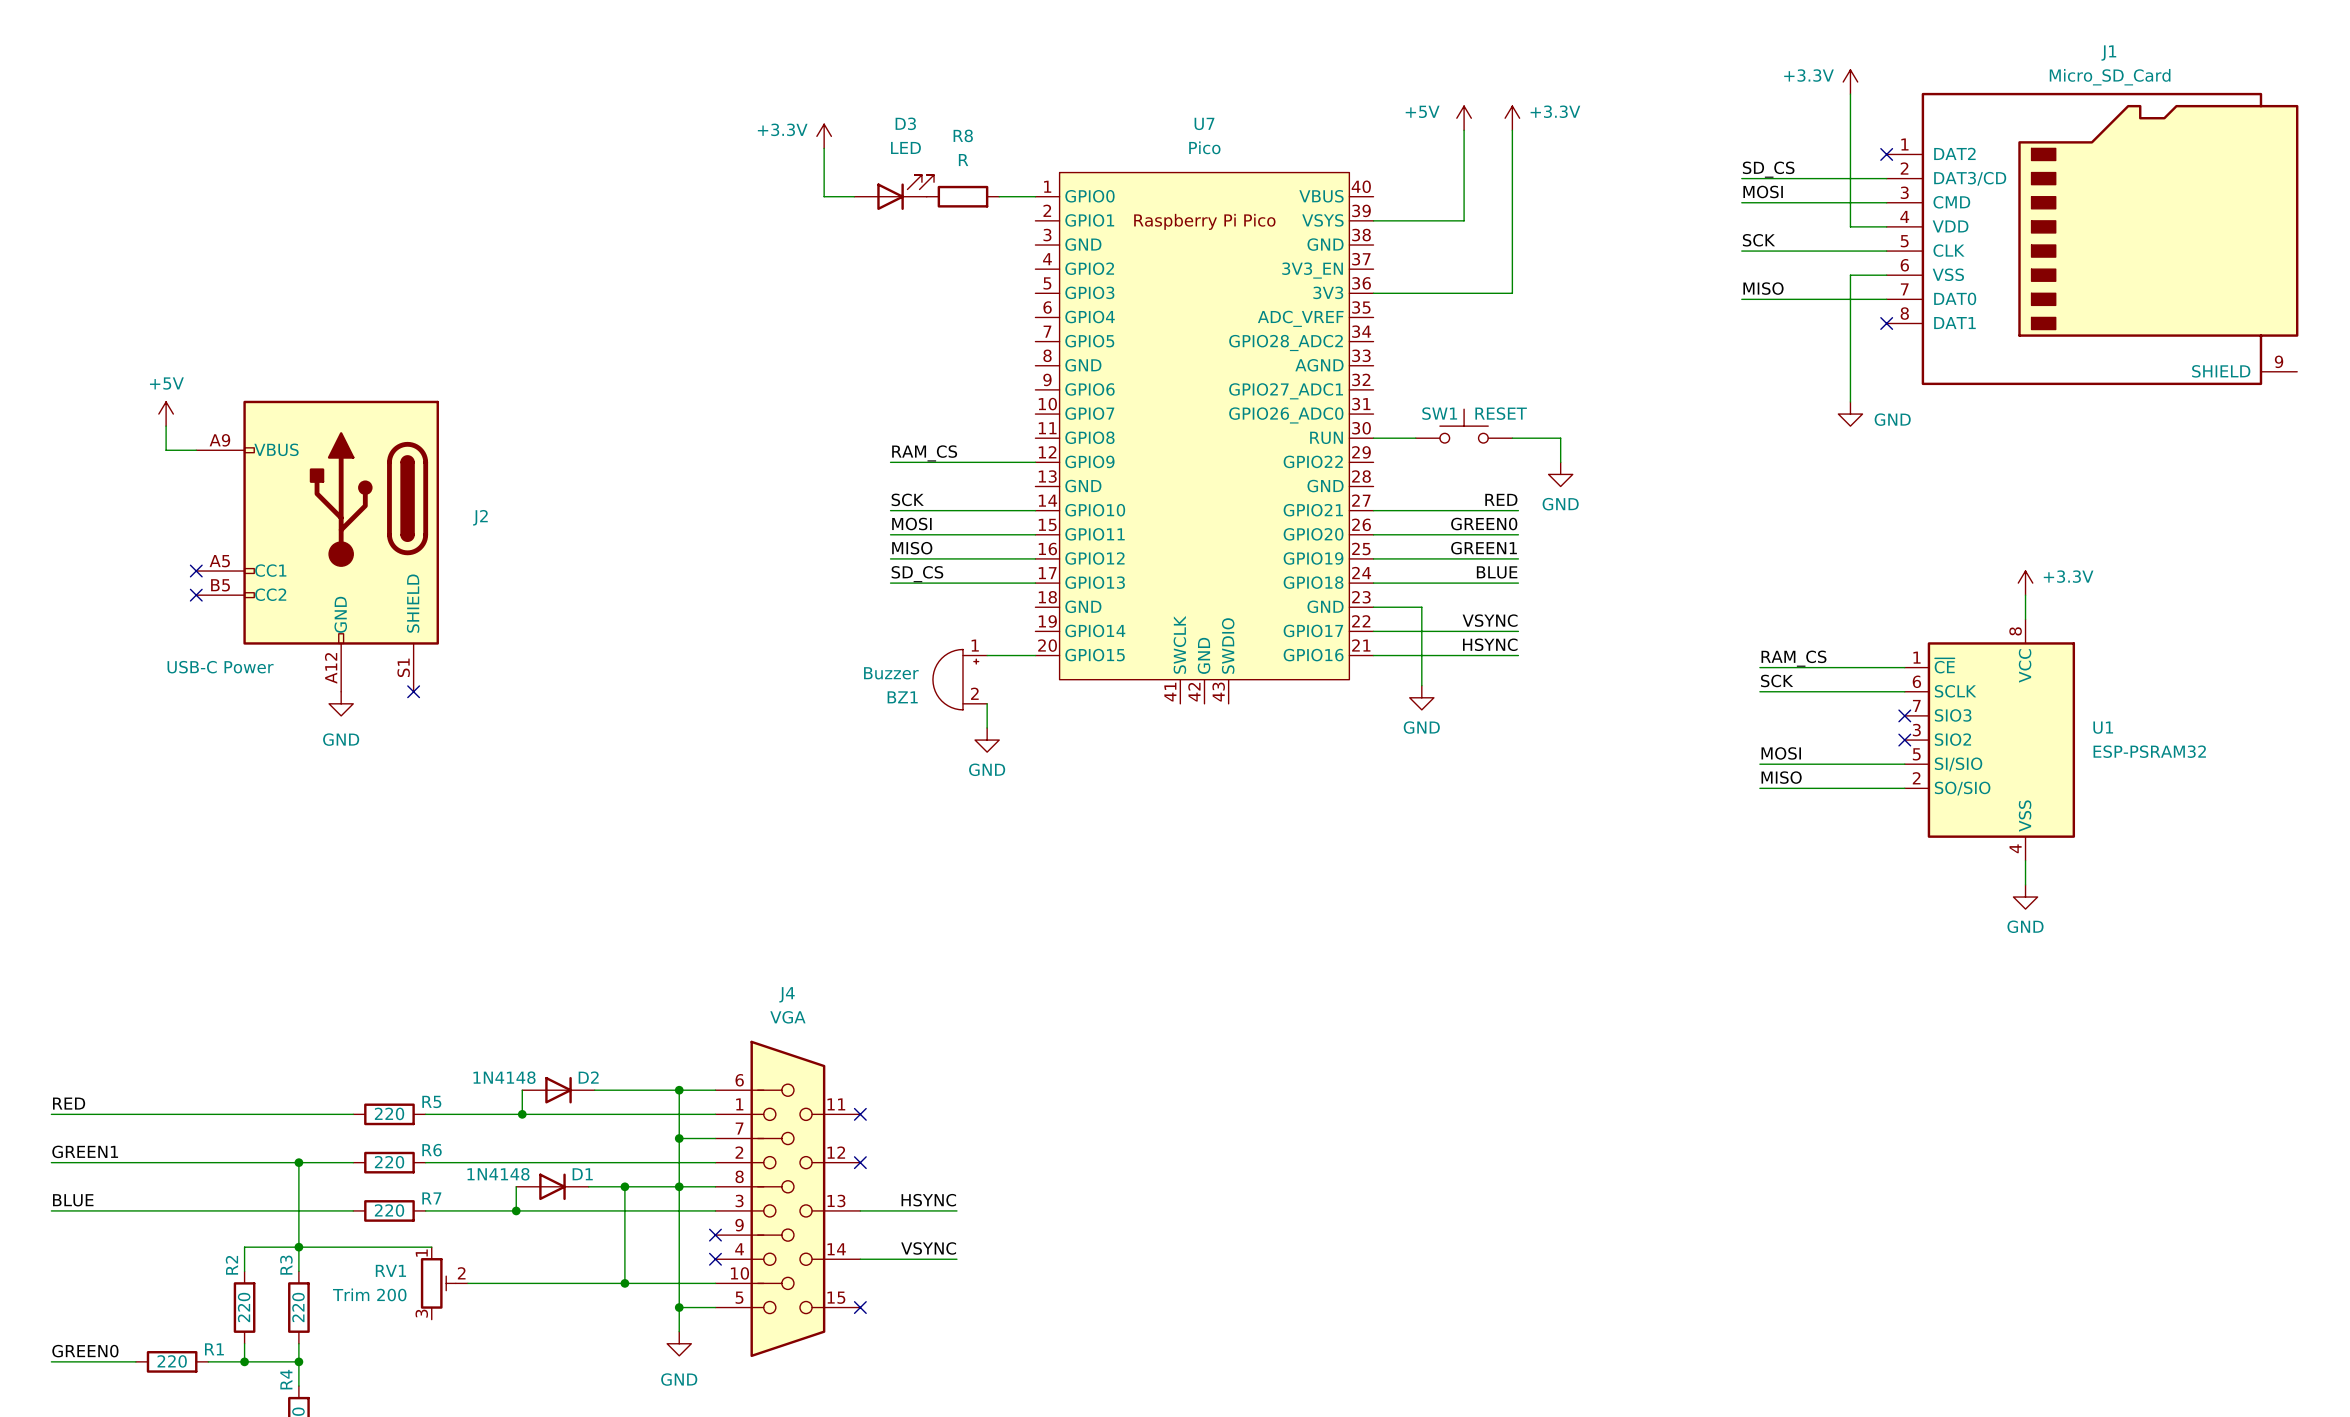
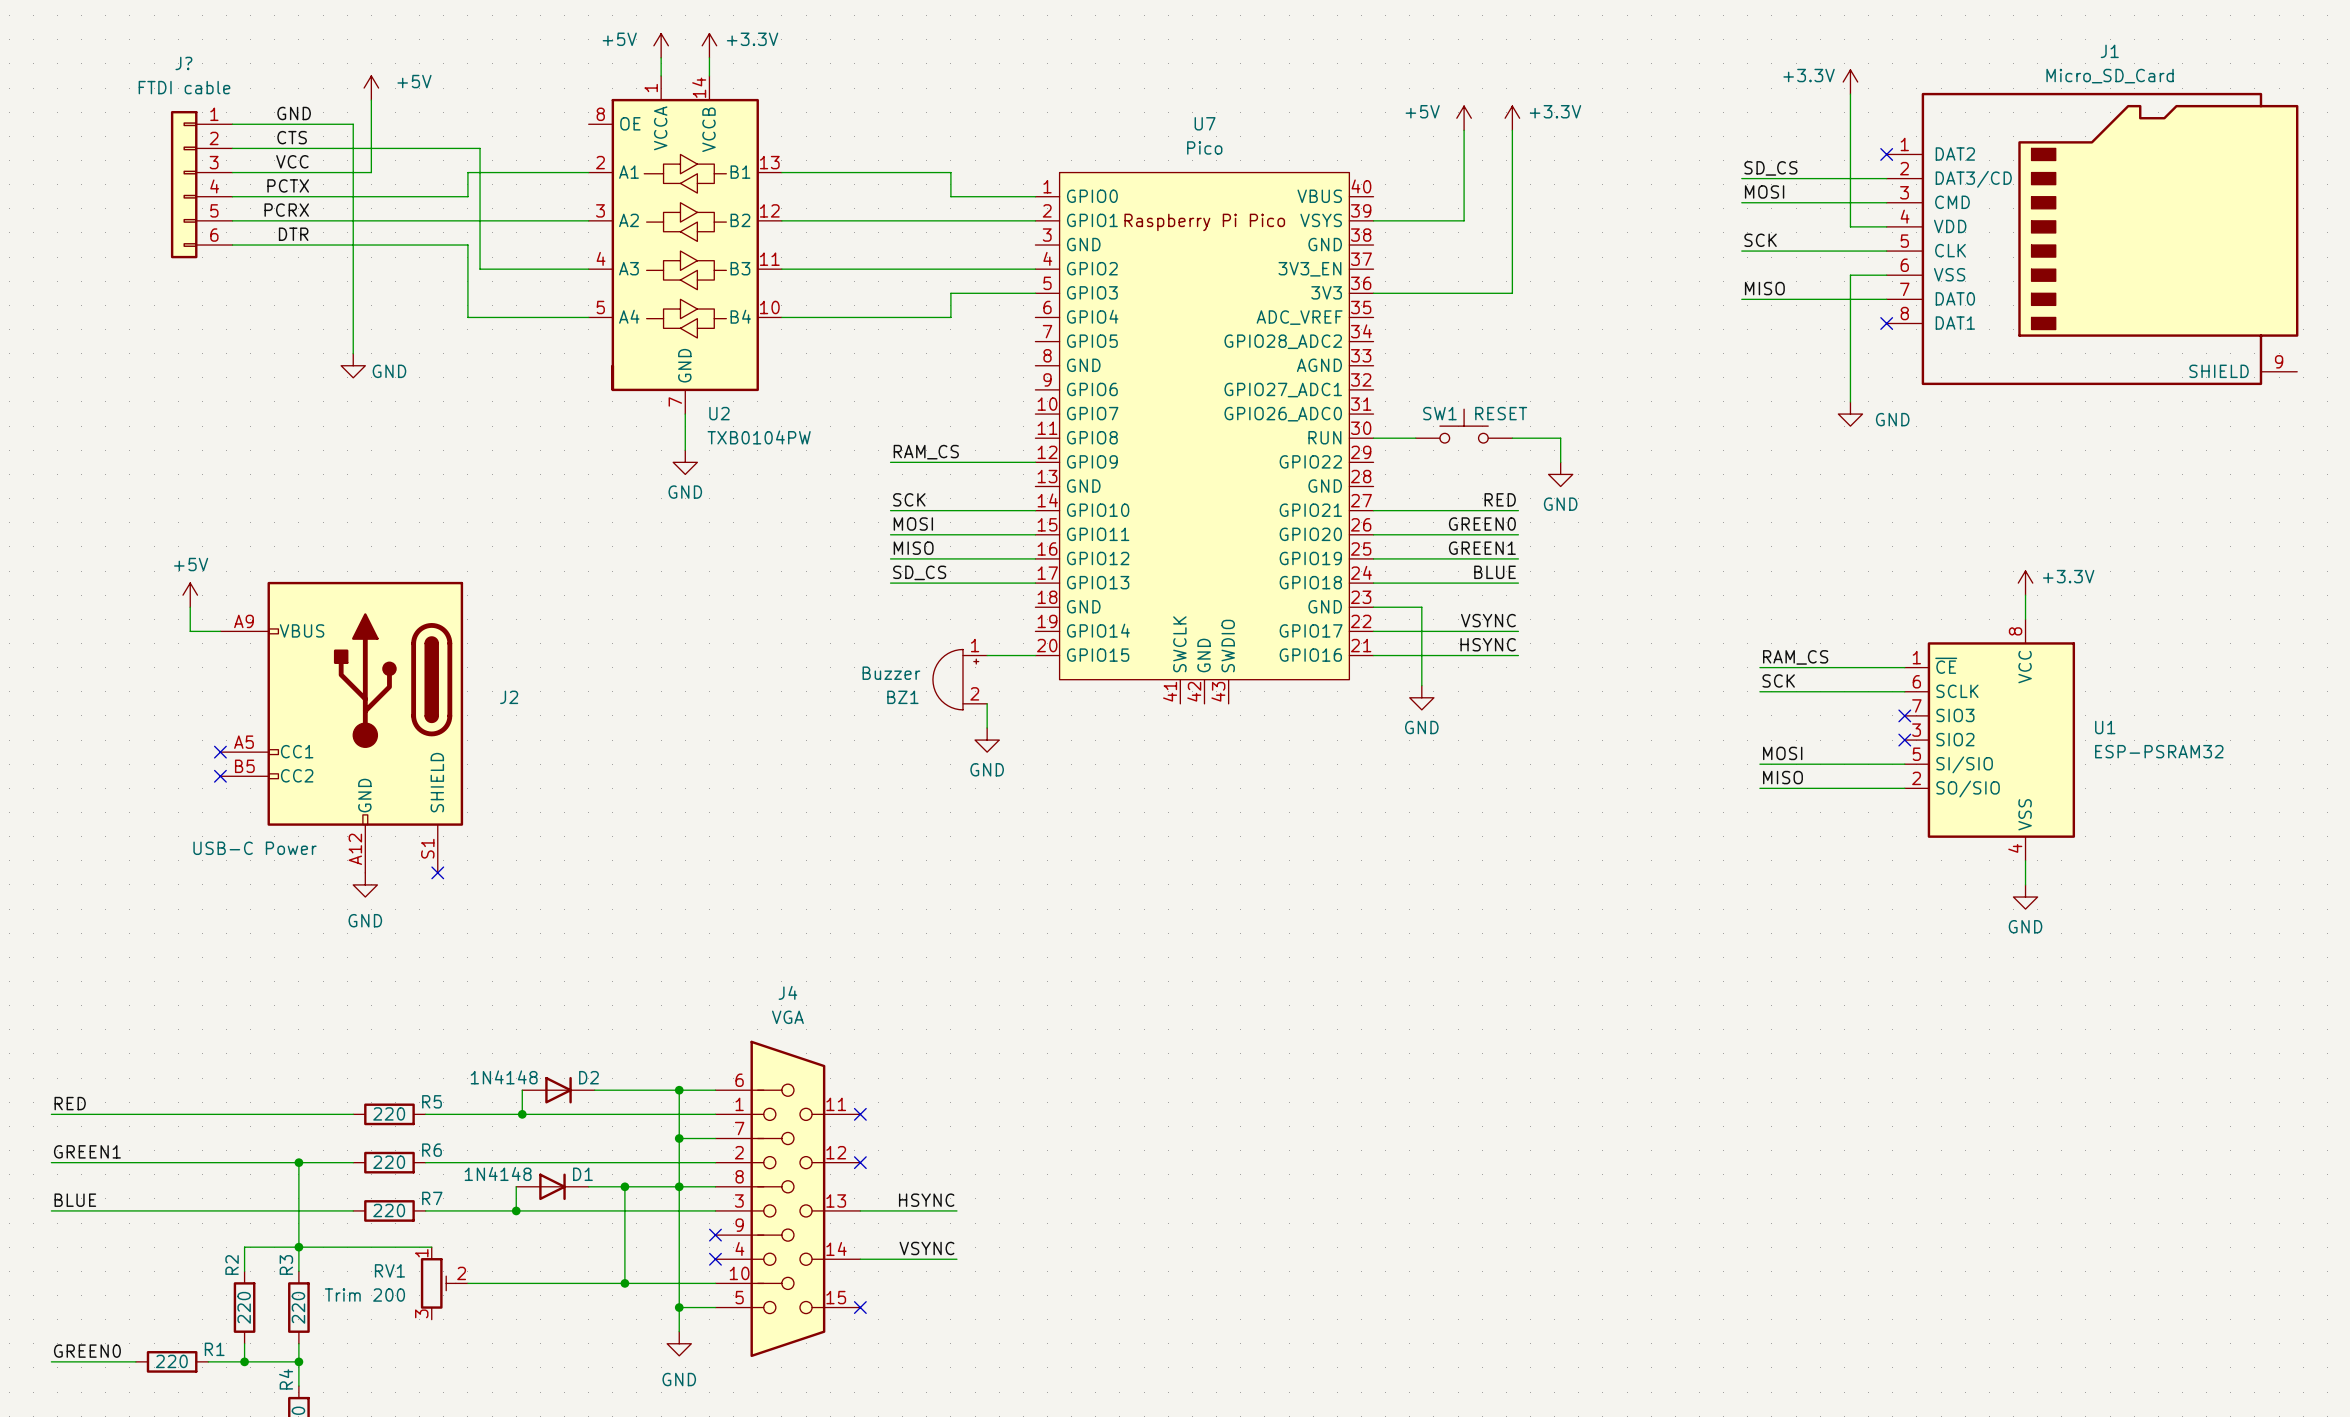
power symbol: none -> +5V (661, 45)
wire: none -> (661, 57) (661, 75)
wire: none -> (709, 57) (709, 75)
power symbol: none -> +5V (371, 88)
wire: none -> (371, 100) (371, 172) (232, 172)
label: none -> GND (294, 113)
wire: none -> (232, 124) (353, 124) (353, 353)
power symbol text position: +3.3V (782, 129) -> +3.3V (752, 39)
power symbol position: +3.3V (824, 136) -> +3.3V (709, 45)
label: none -> CTS (292, 137)
wire: none -> (232, 148) (480, 148) (480, 269) (588, 269)
wire: (824, 148) (824, 196) (854, 196) -> none
label: none -> VCC (292, 161)
wire: none -> (588, 172) (467, 172) (467, 196) (232, 196)
wire: none -> (781, 172) (950, 172) (950, 196) (999, 196)
J?: none -> FTDI cable (201, 184)
label: none -> PCTX (288, 185)
D3: LED (894, 192) -> none
R8: R (962, 196) -> none
label: none -> PCRX (286, 210)
wire: none -> (232, 220) (588, 220)
wire: none -> (781, 220) (1035, 220)
label: none -> DTR (293, 234)
wire: none -> (232, 245) (467, 245) (467, 317) (588, 317)
U2: none -> TXB0104PW (685, 245)
wire: none -> (781, 269) (1035, 269)
wire: none -> (1035, 293) (950, 293) (950, 317) (781, 317)
power symbol: none -> GND (353, 365)
power symbol position: +5V (166, 414) -> +5V (190, 595)
wire: none -> (685, 414) (685, 450)
wire: (166, 426) (166, 450) (196, 450) -> (190, 607) (190, 631) (220, 631)
power symbol: none -> GND (685, 462)
J2 position: (317, 546) -> (341, 727)
no-connect mark: (196, 571) -> none
no-connect mark: (196, 595) -> none
no-connect mark: (413, 691) -> none
power symbol: GND (341, 703) -> none
no-connect mark: none -> (220, 752)
no-connect mark: none -> (220, 776)
no-connect mark: none -> (437, 872)
power symbol: none -> GND (365, 884)

